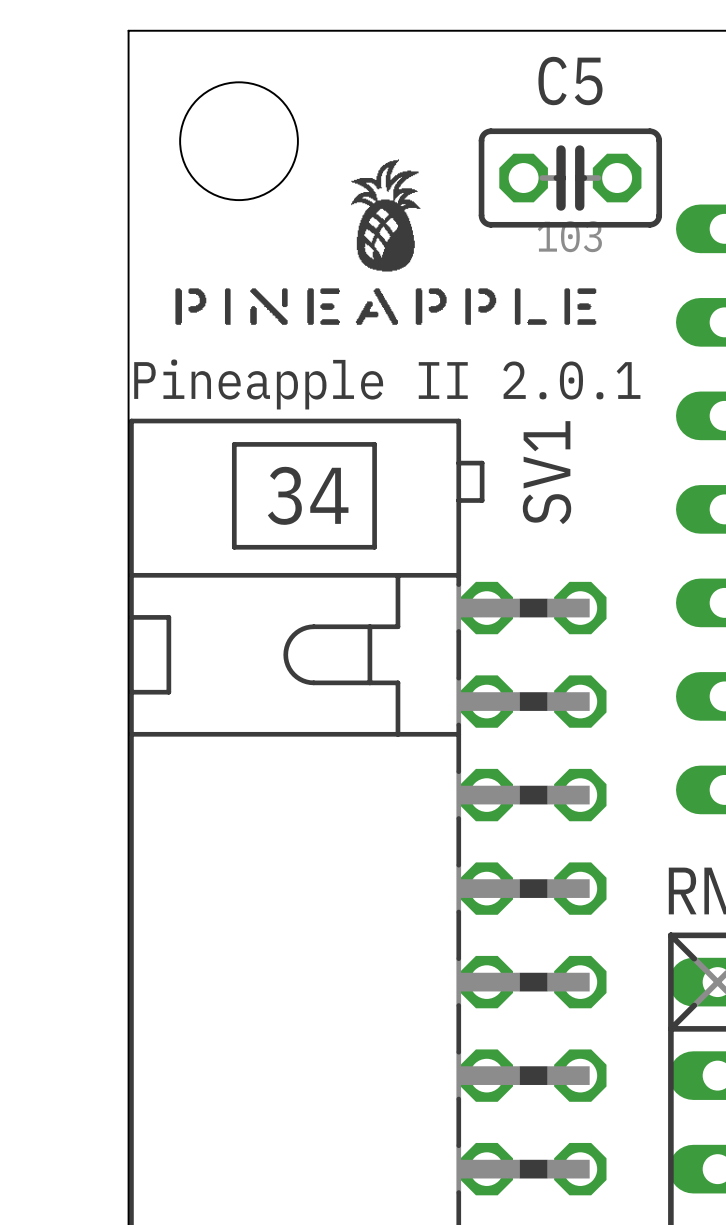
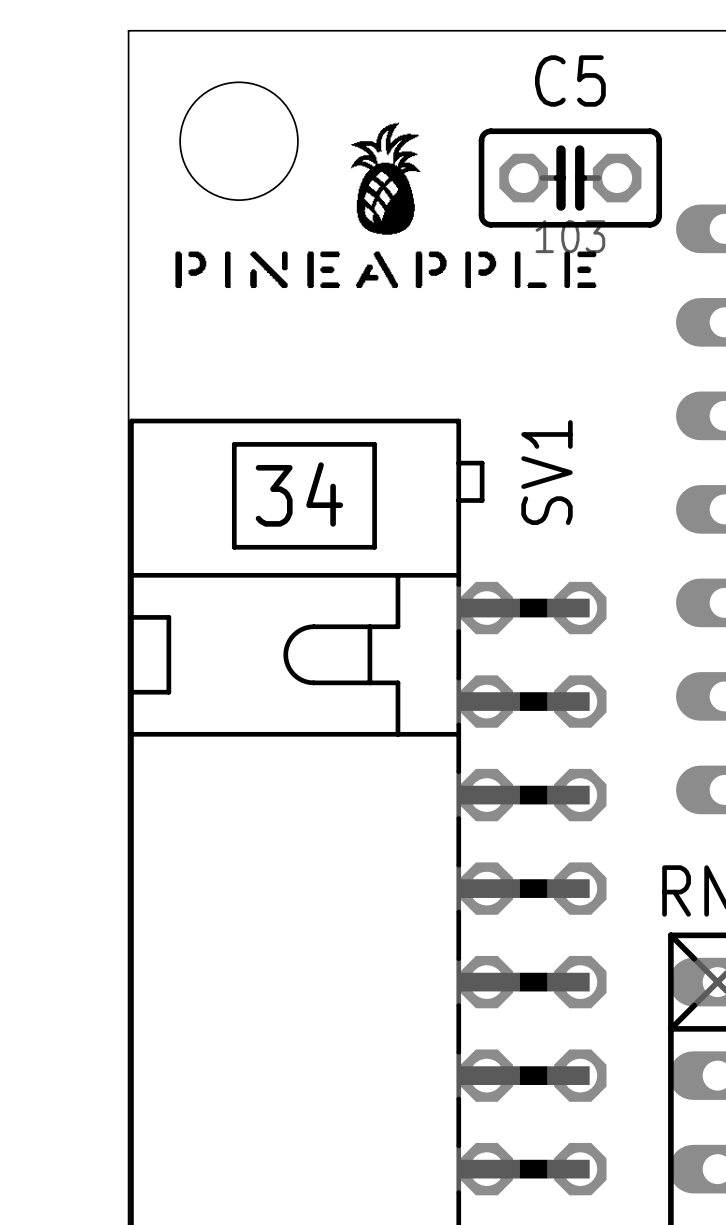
drawing position: (385, 242) -> (385, 205)
text: Pineapple II 2.0.1 (387, 384) -> none

